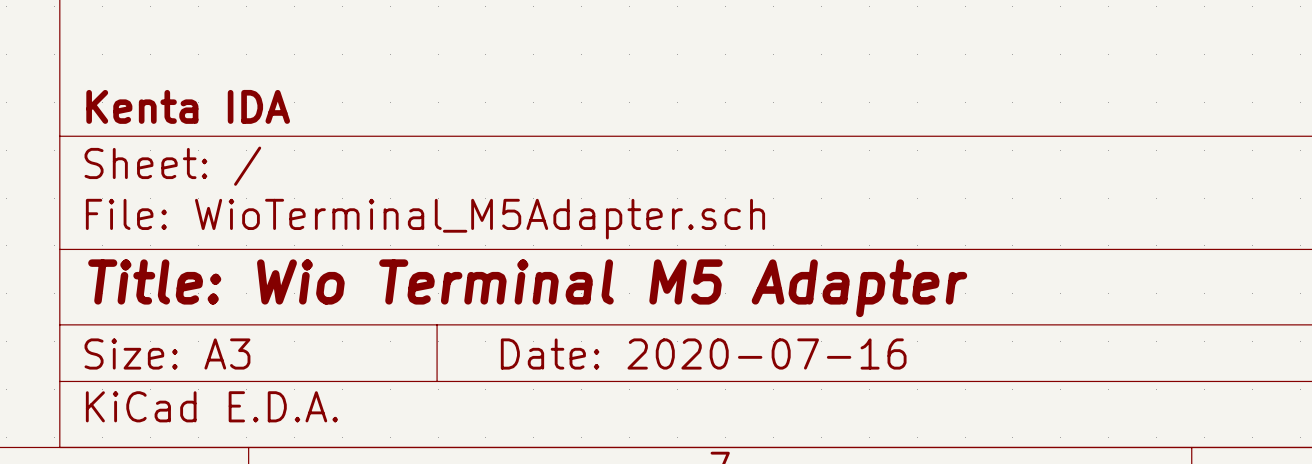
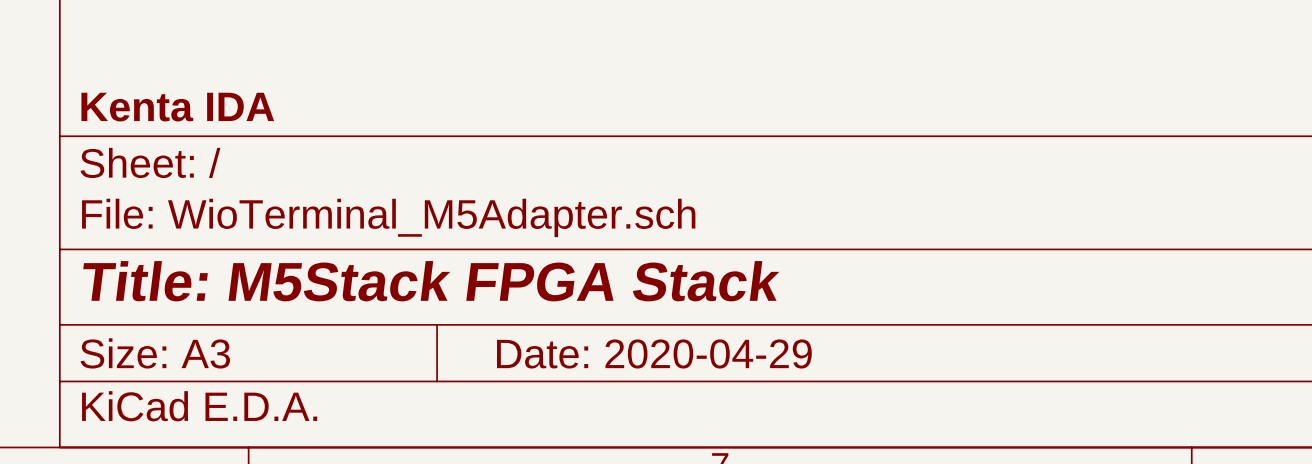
title block: Title: Wio Terminal M5 Adapter (527, 288) -> Title: M5Stack FPGA Stack (431, 281)
title block: Date: 2020-07-16 (703, 353) -> Date: 2020-04-29 (654, 353)

